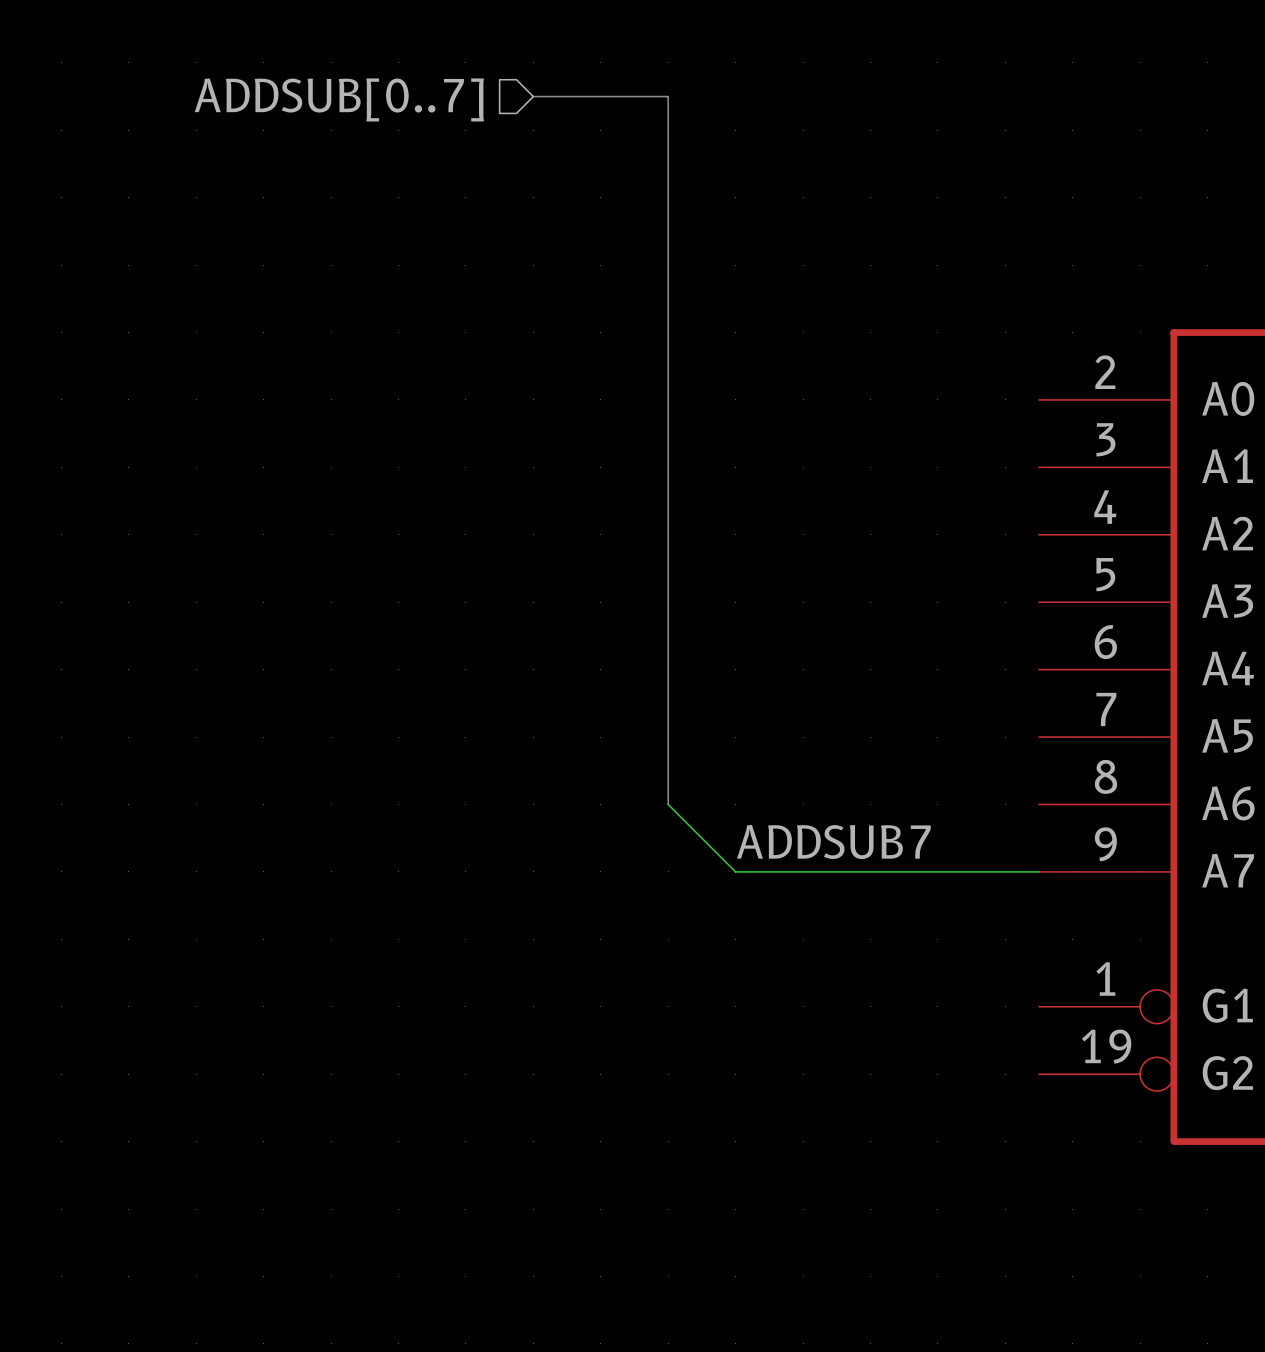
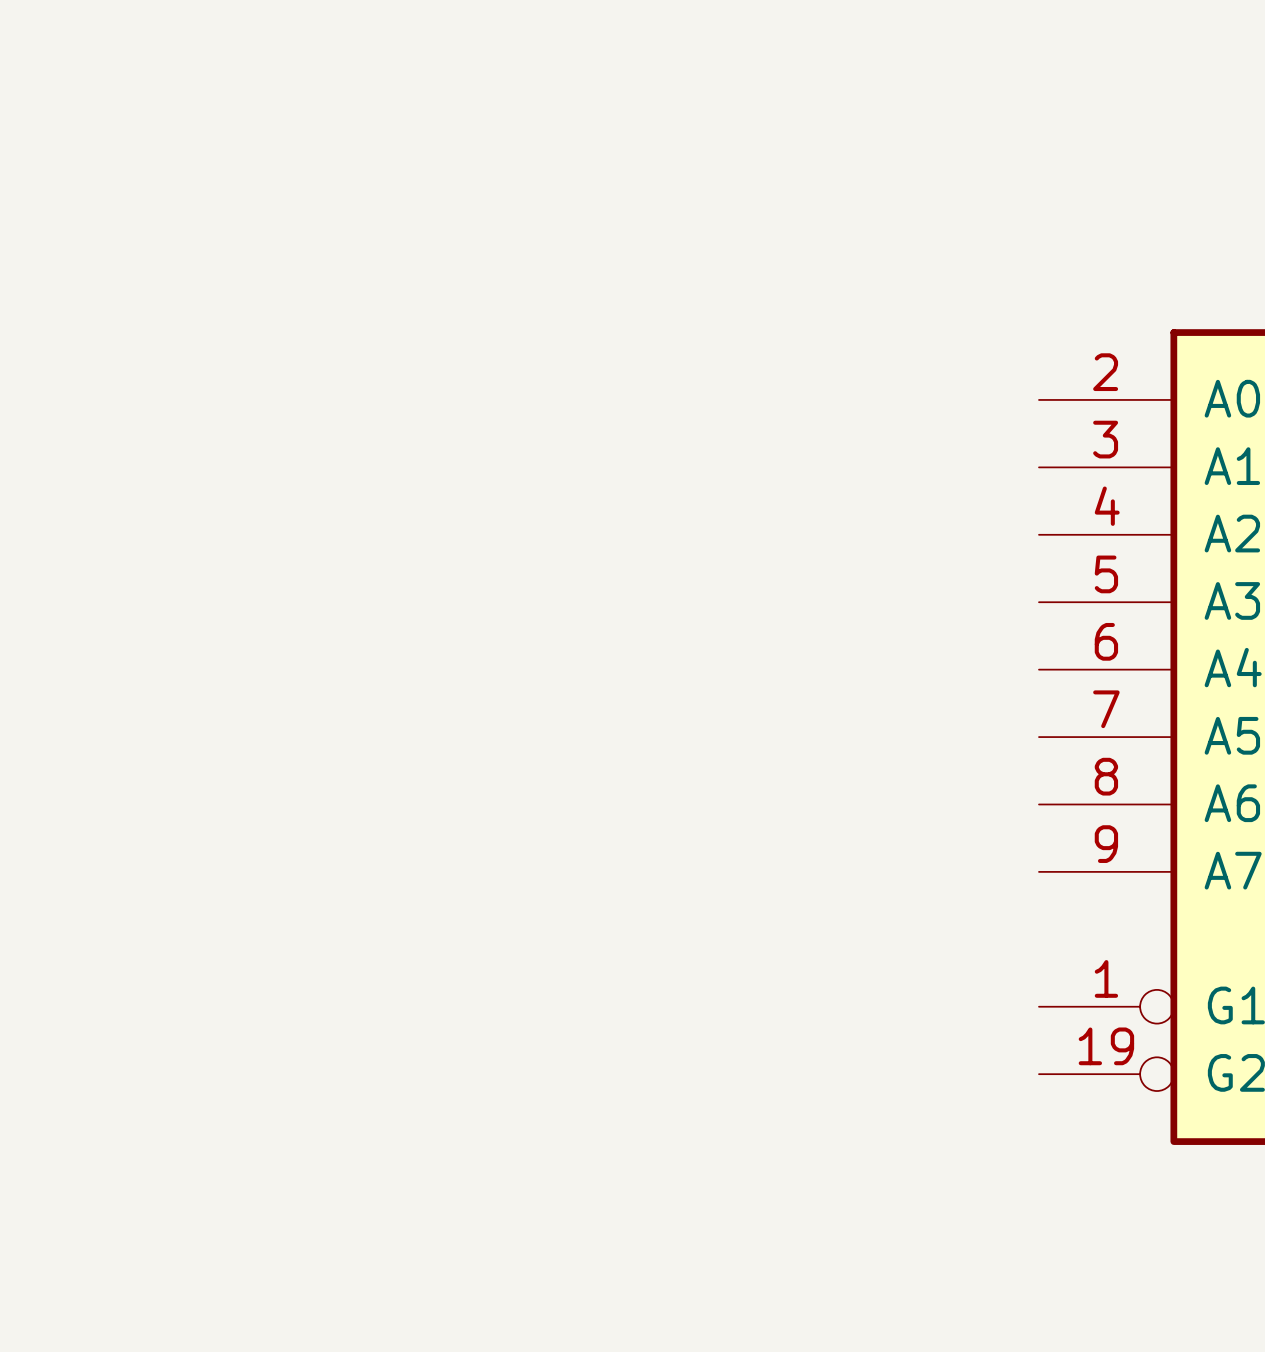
bus: (533, 96) (668, 96) (668, 804) -> none
hierarchical label: ADDSUB[0..7] (339, 99) -> none
wire: (668, 804) (735, 871) (1038, 871) -> none
label: ADDSUB7 (833, 842) -> none

